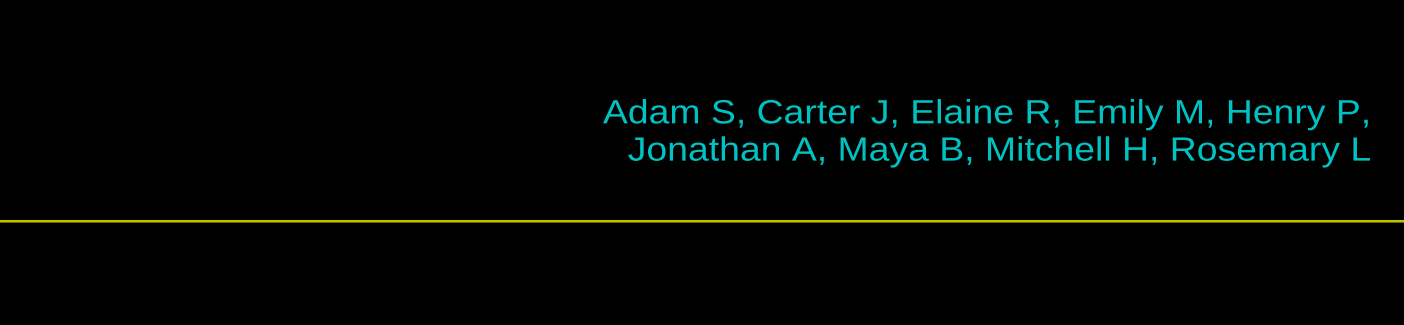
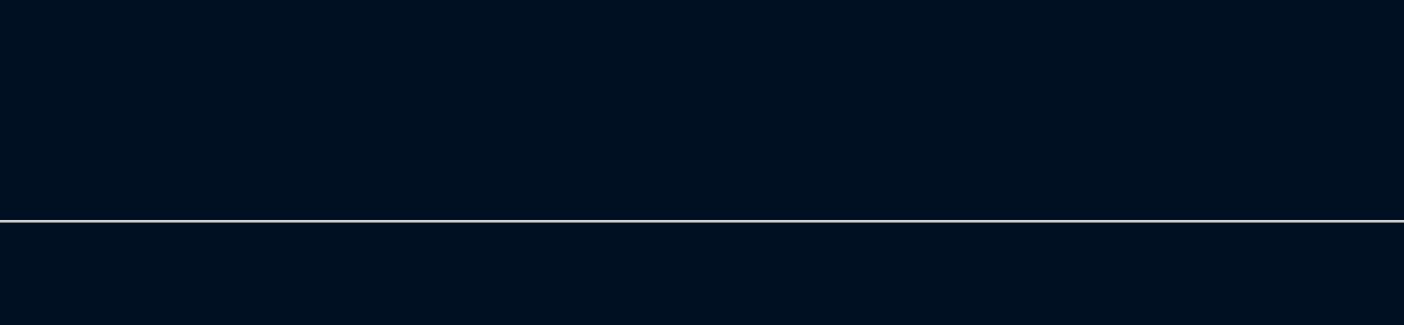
text: Adam S, Carter J, Elaine R, Emily M, Henry P, (985, 114) -> none
text: Jonathan A, Maya B, Mitchell H, Rosemary L (999, 151) -> none

